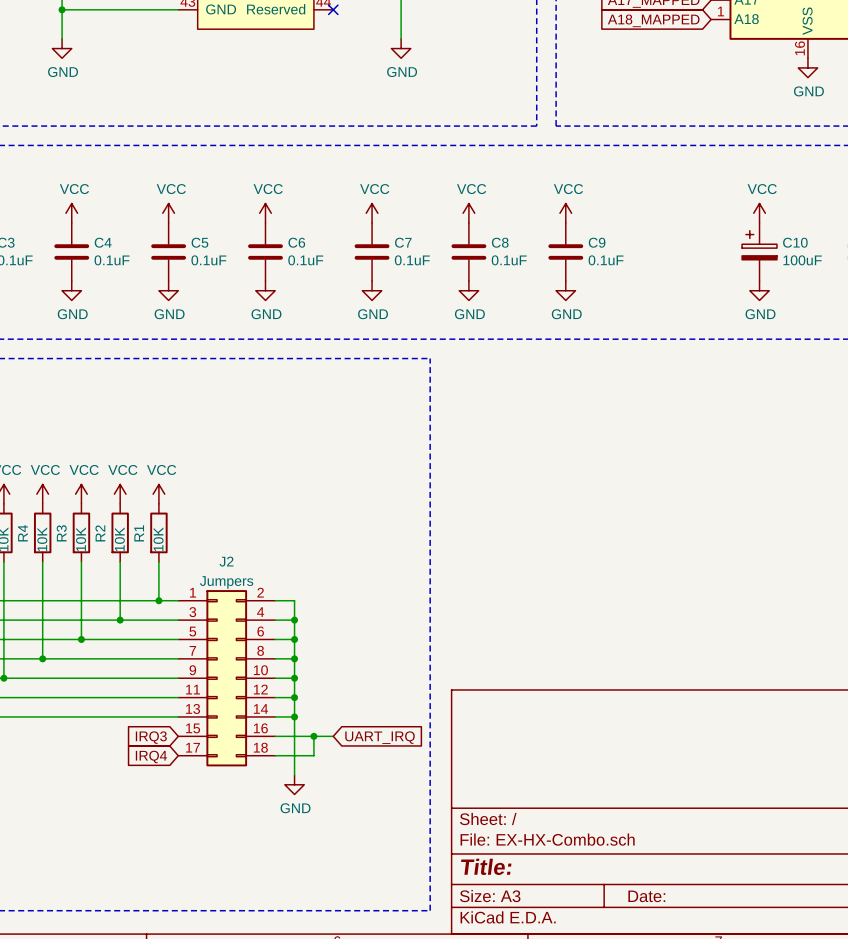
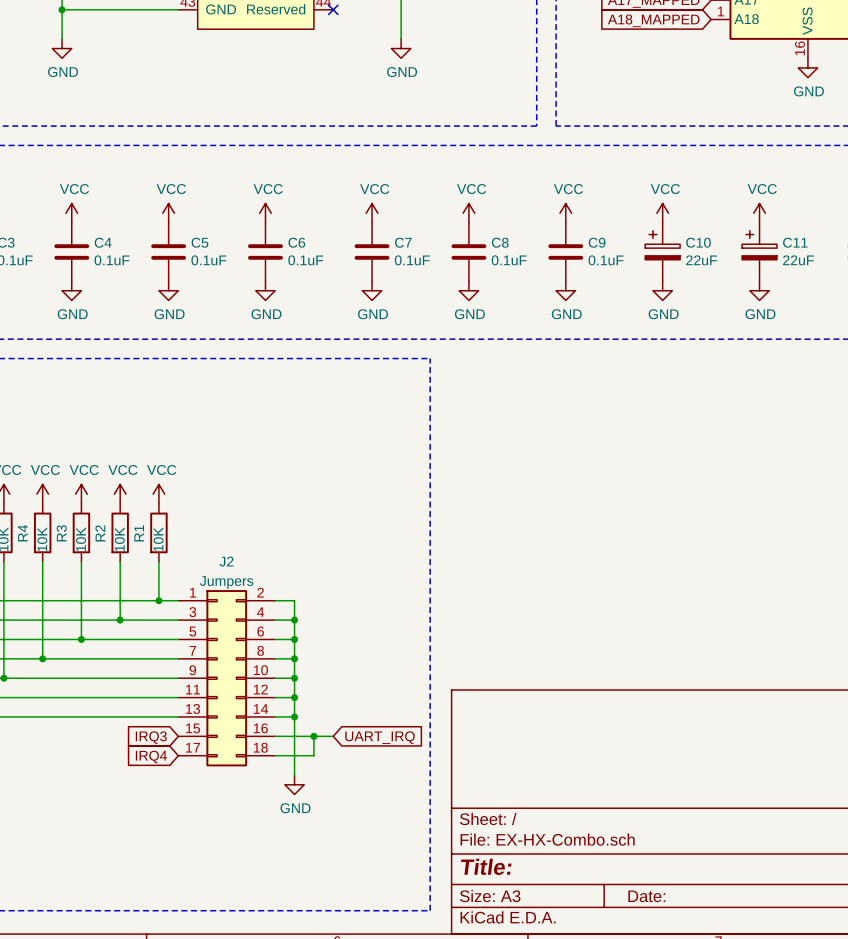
power symbol: none -> VCC (662, 213)
C10 name: C10 (795, 242) -> C11 (795, 242)
C10: none -> 22uF (662, 252)
C10 value: 100uF (802, 260) -> 22uF (798, 260)
power symbol: none -> GND (662, 290)

